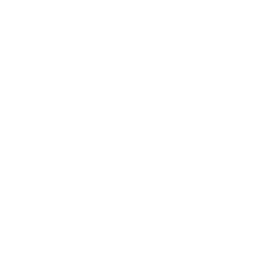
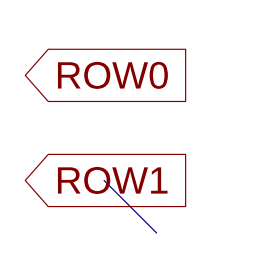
global label: none -> ROW0 (112, 75)
bus: none -> (104, 180) (156, 233)
global label: none -> ROW1 (112, 180)

